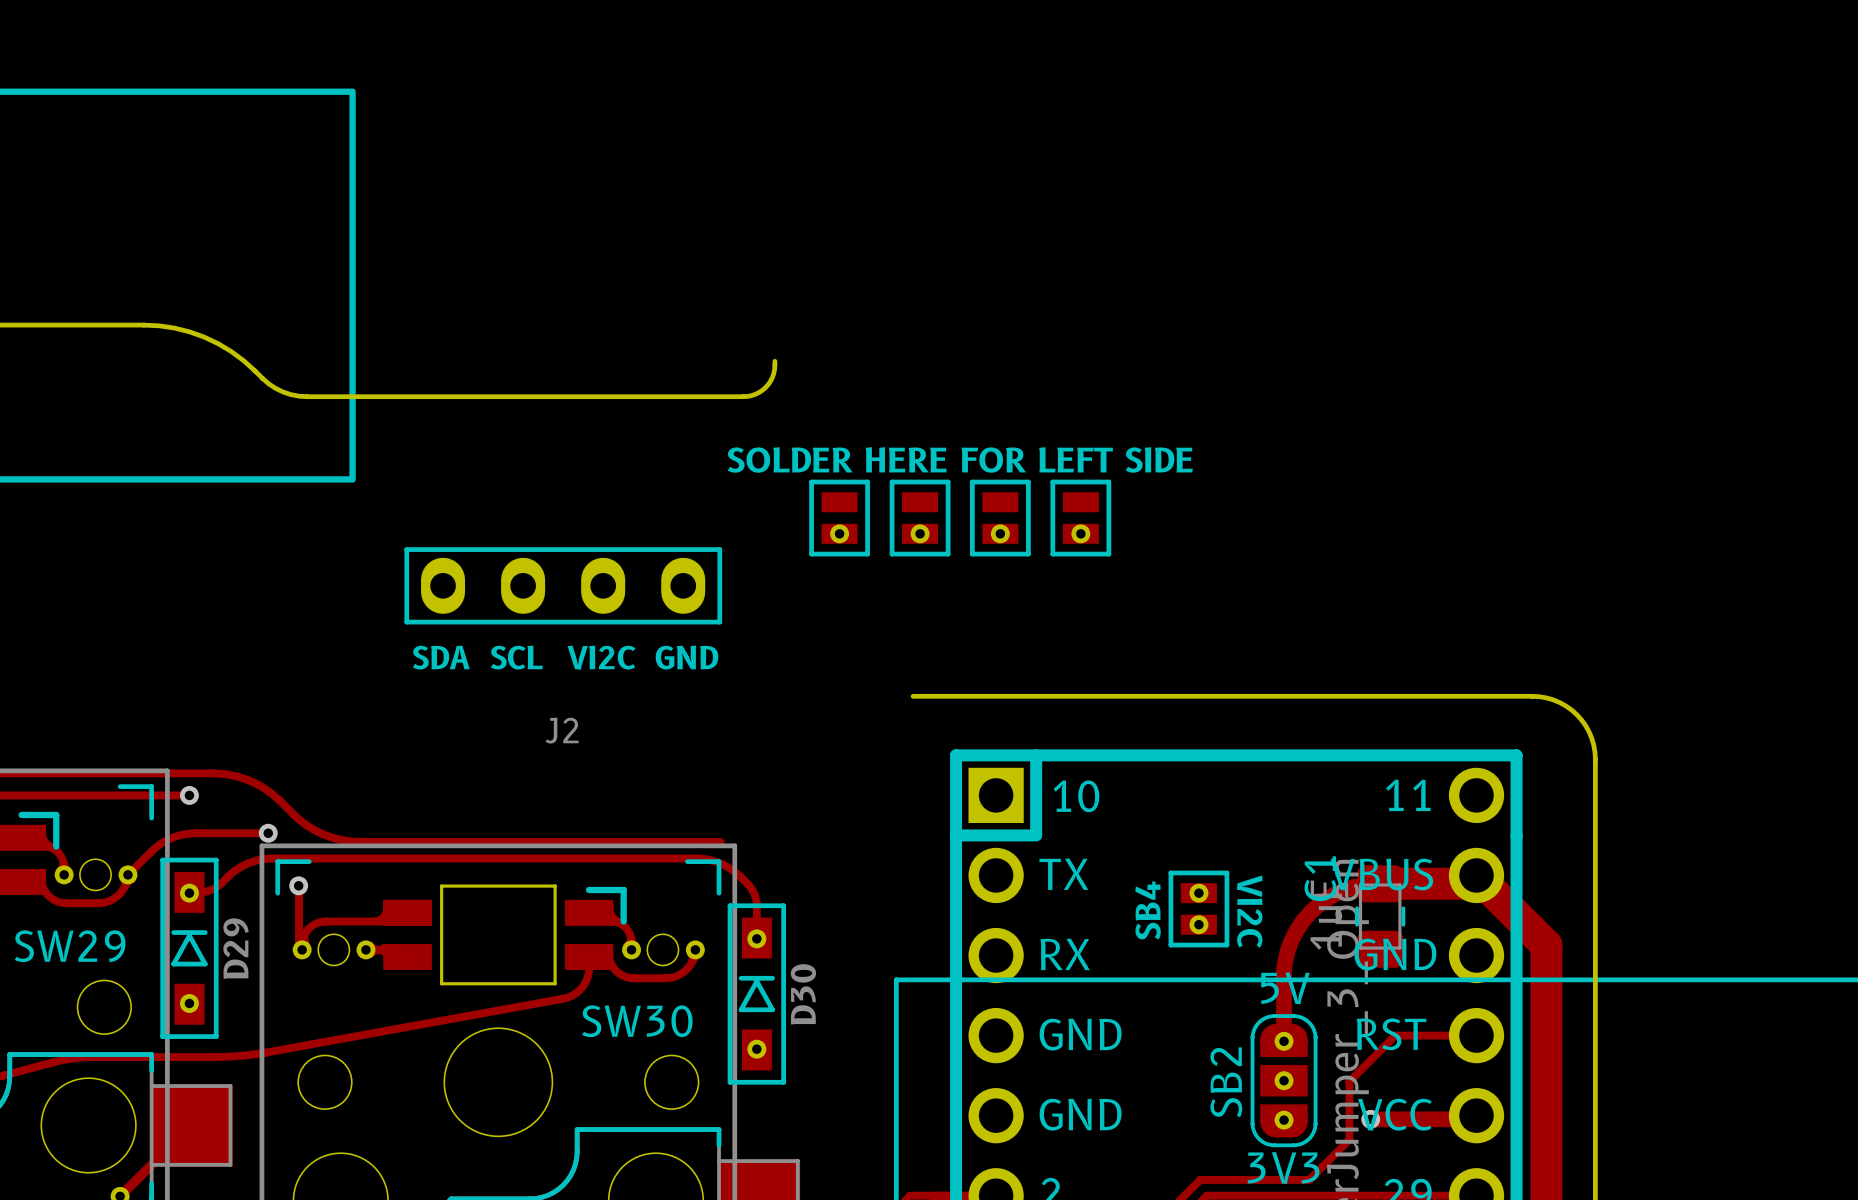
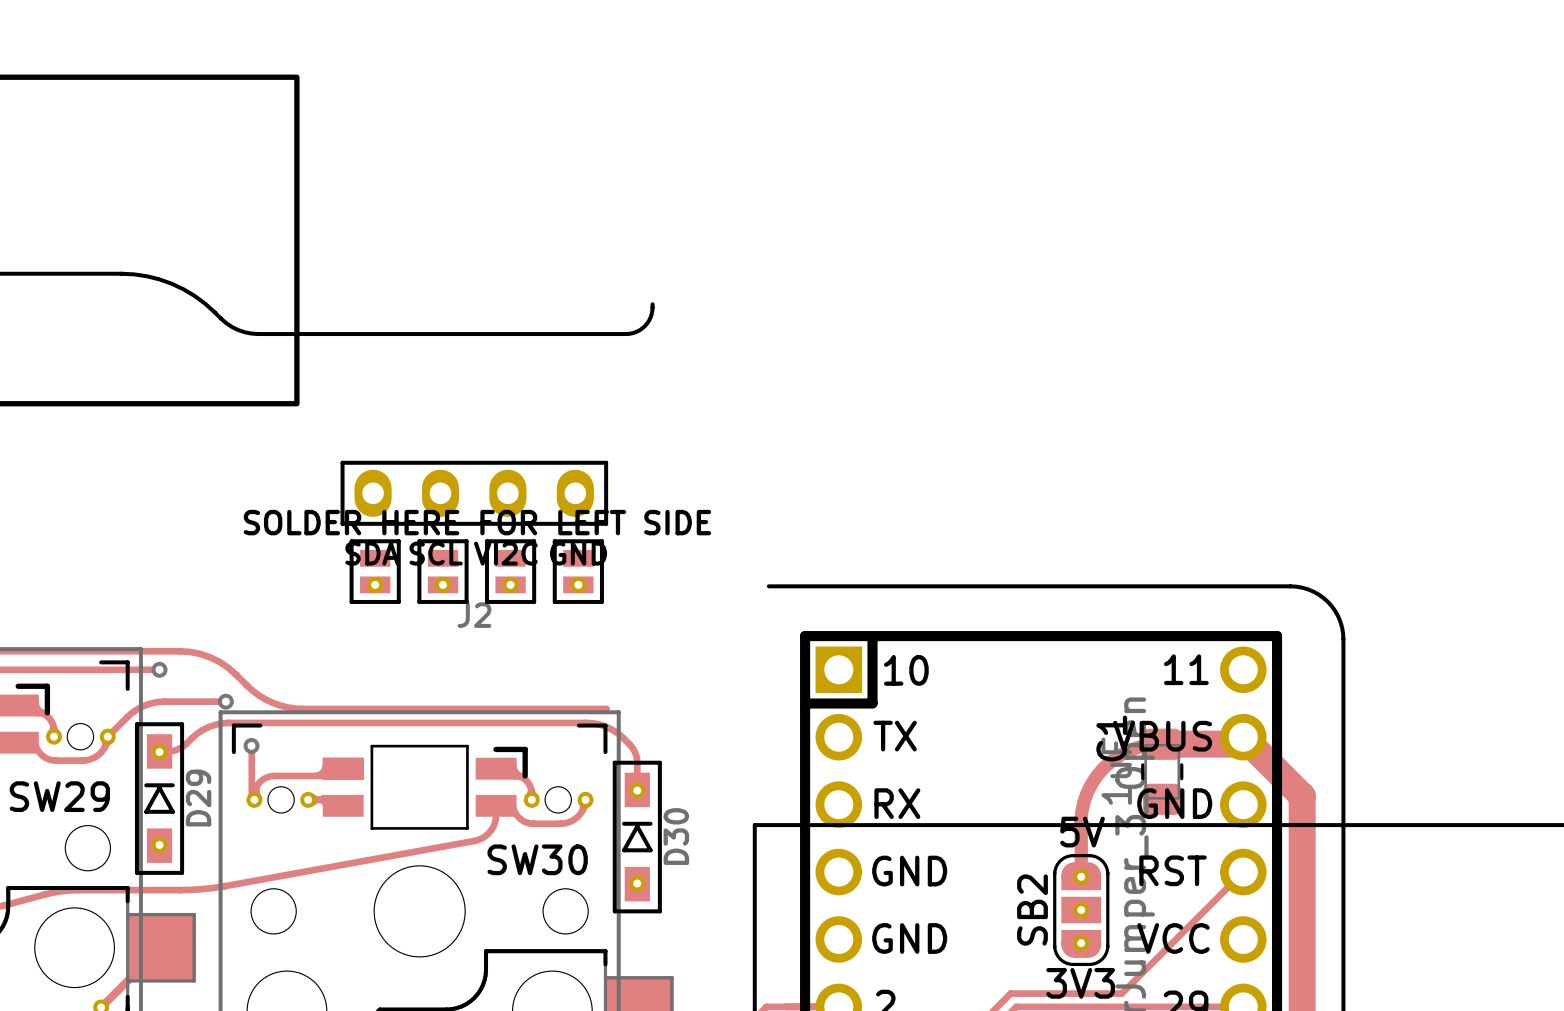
part position: (960, 518) -> (476, 571)
SB4: VI2C (1198, 909) -> none
track: (1476, 1035) (1395, 1035) (1349, 1081) (1349, 1139) (1309, 1179) -> (1243, 872) (1121, 993) (1102, 993)
track: (1476, 1115) (1472, 1119) (1370, 1119) -> none
via: (1370, 1119) -> none

